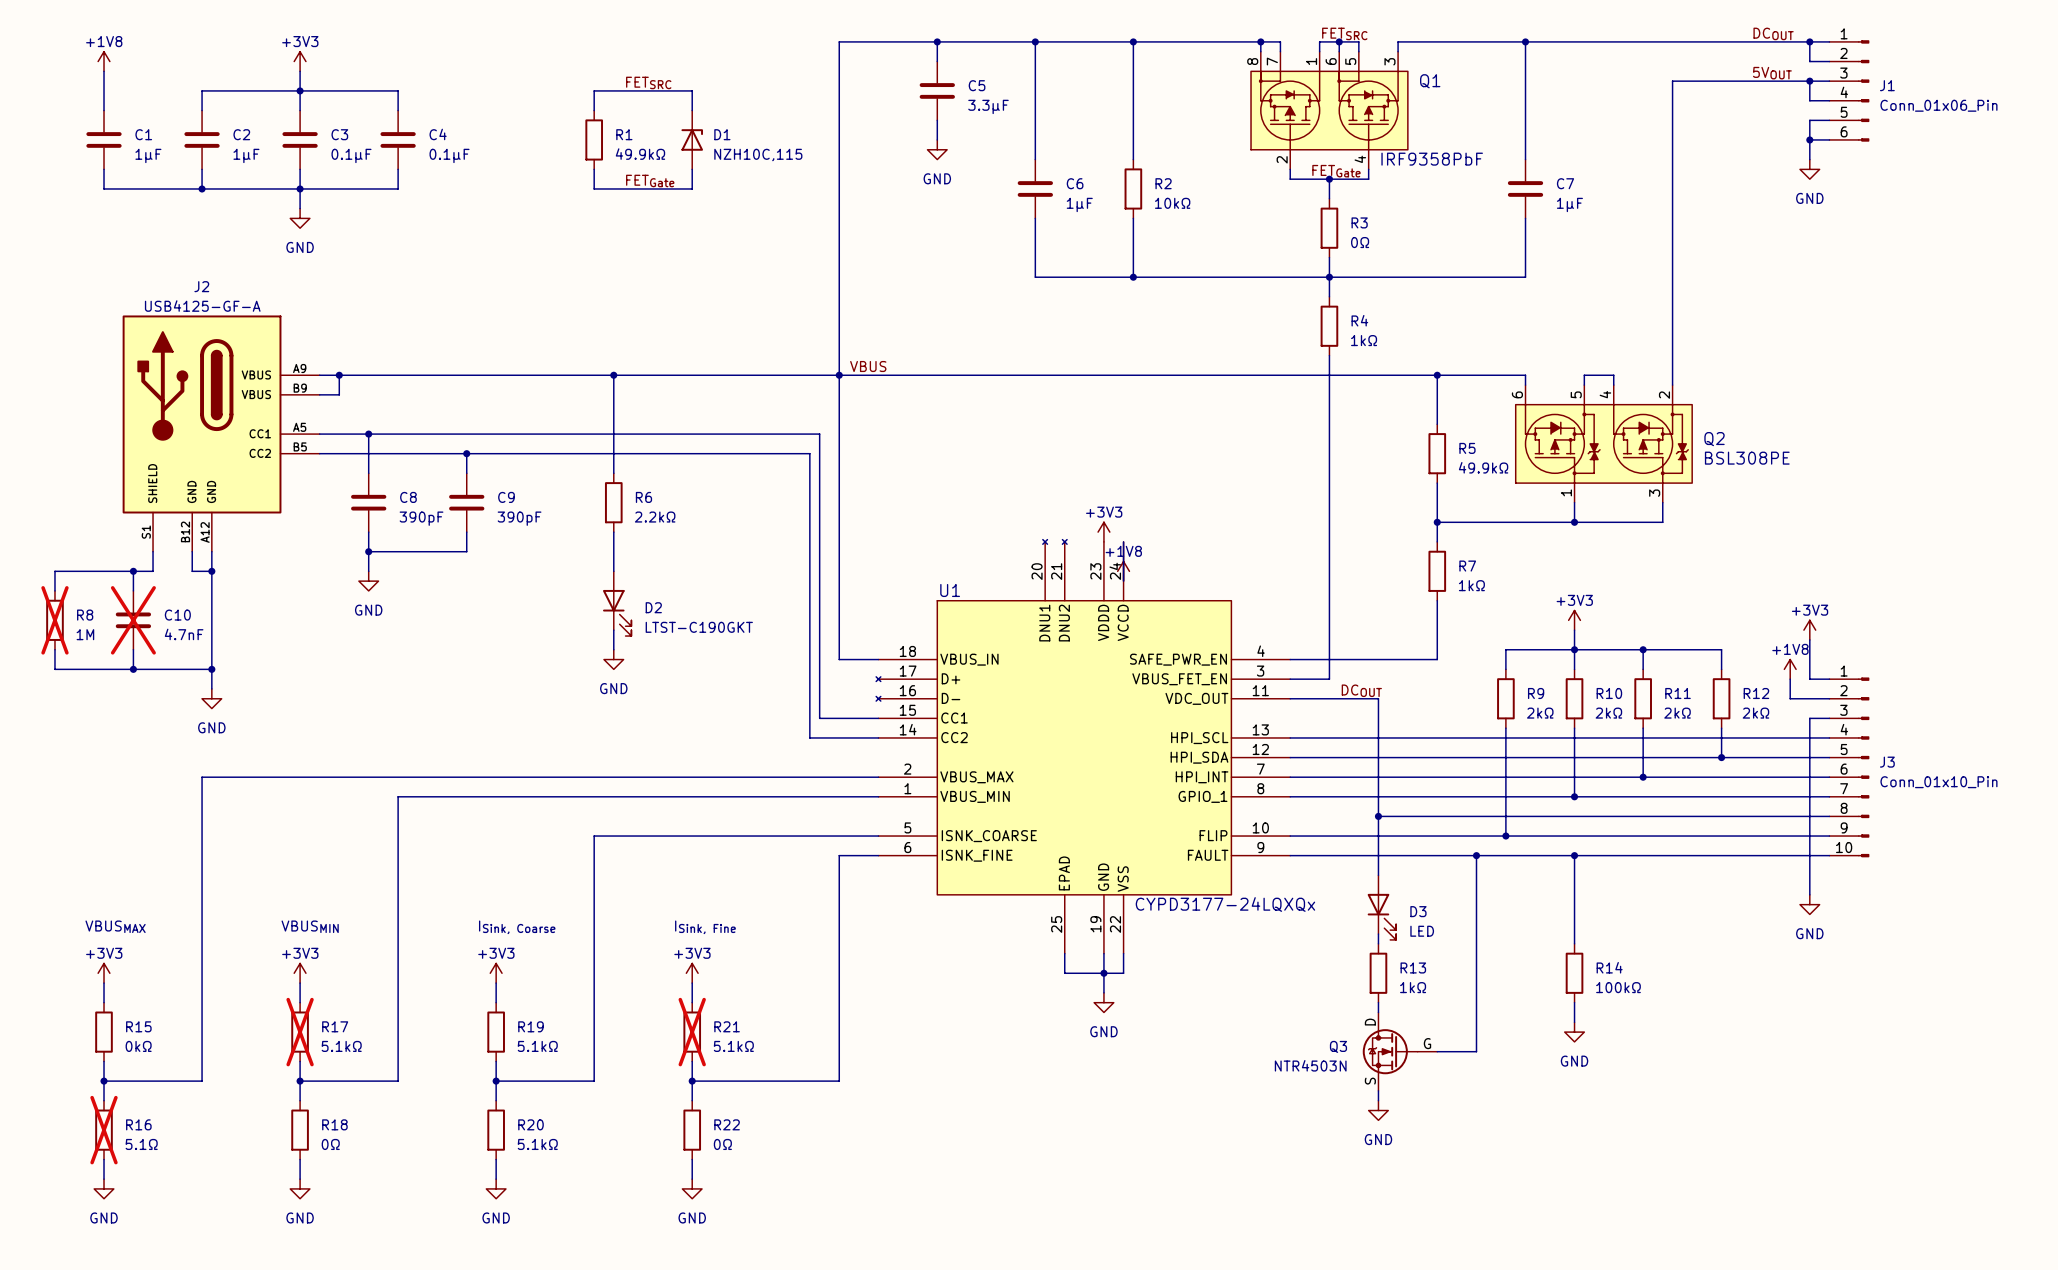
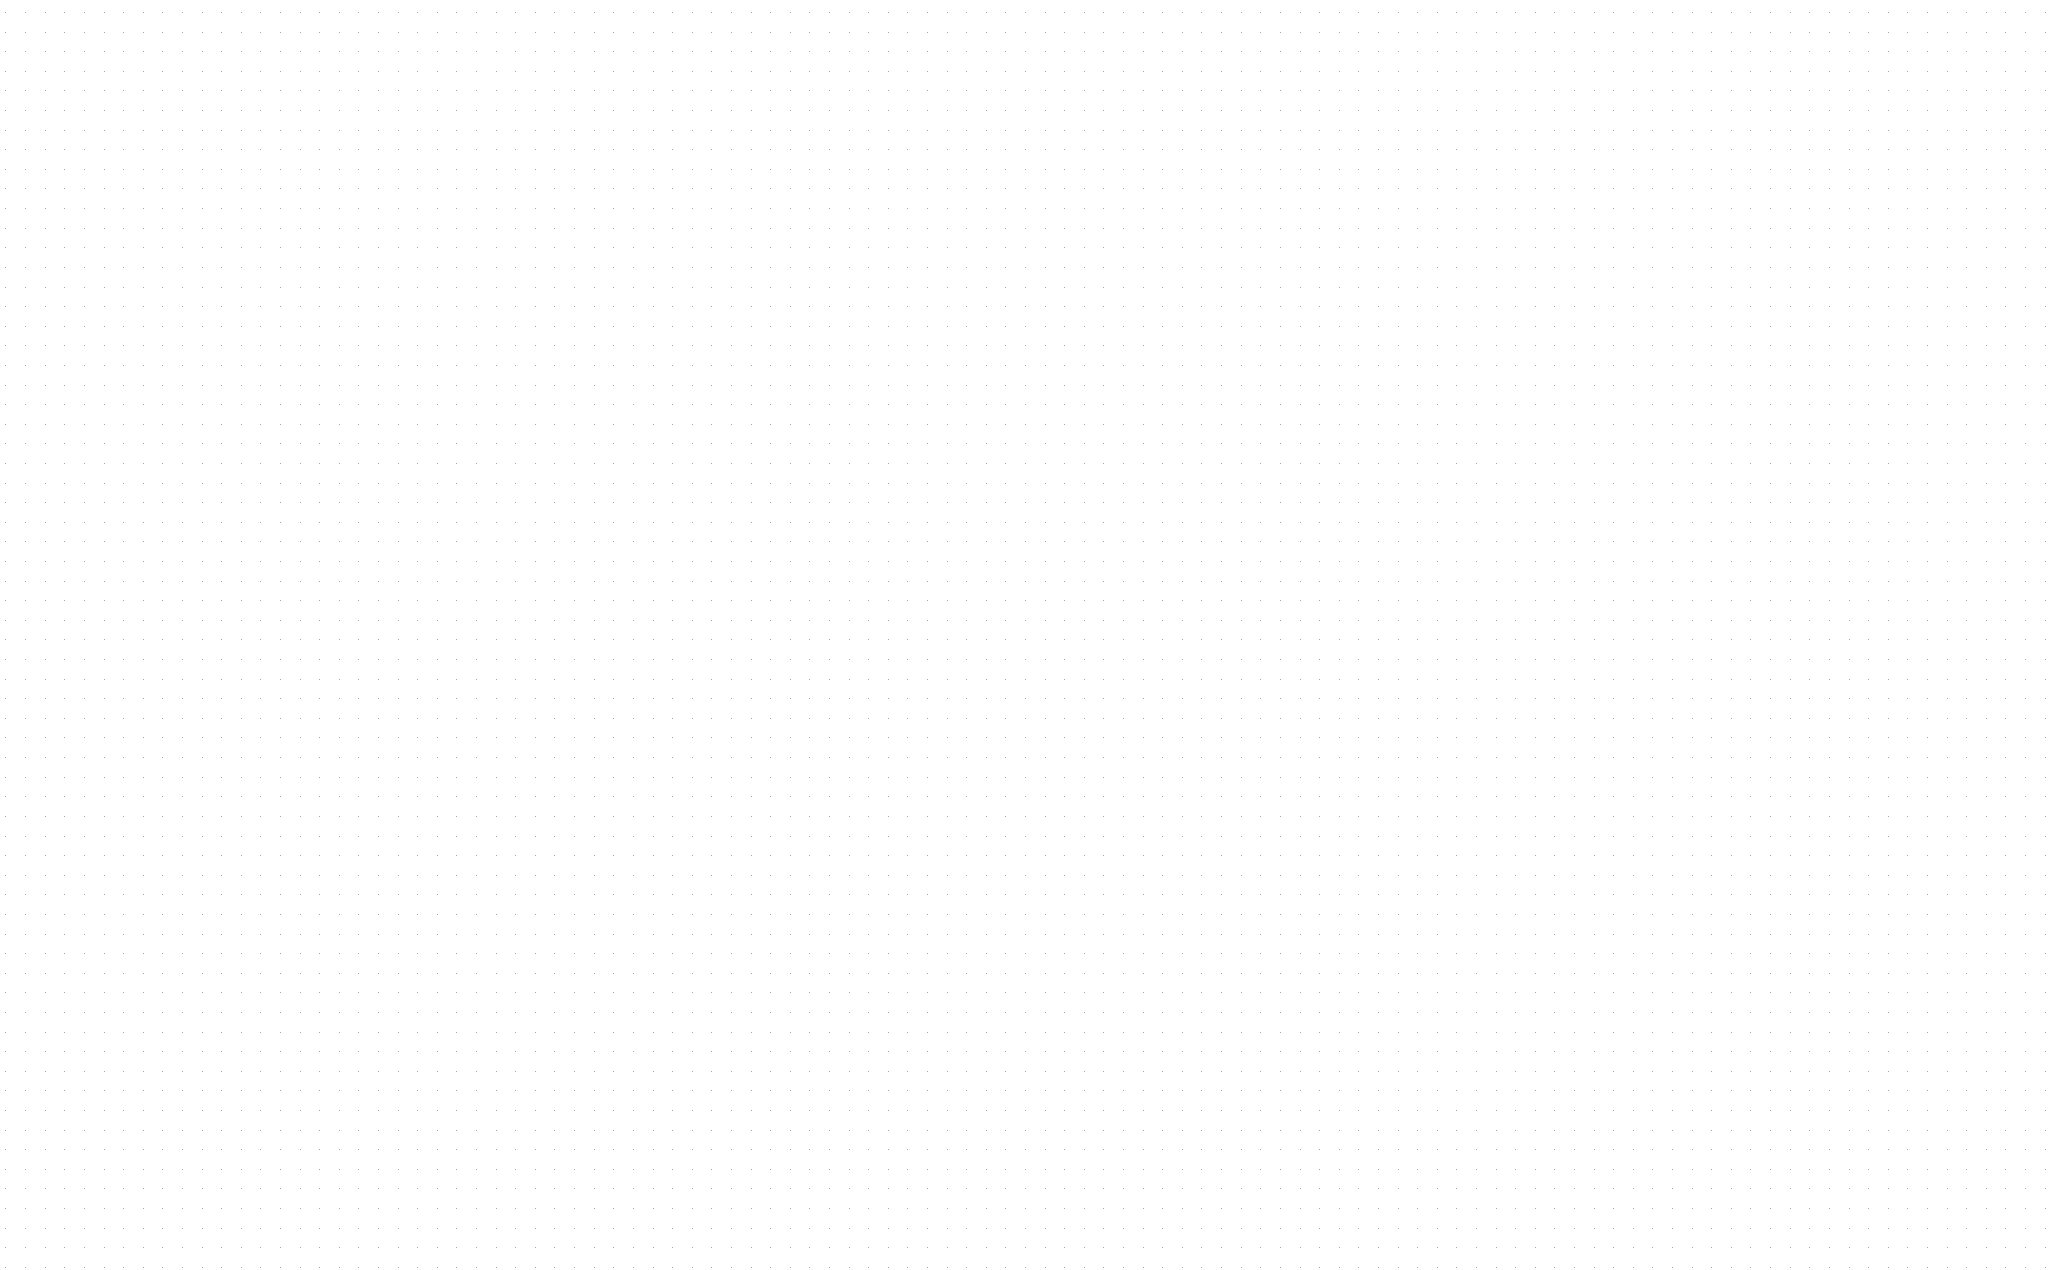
label: FETSRC (1344, 33) -> none
label: DCOUT (1773, 33) -> none
wire: (937, 41) (937, 61) -> none
junction: (937, 41) -> none
wire: (1035, 41) (1035, 159) -> none
junction: (1035, 41) -> none
wire: (1133, 41) (1133, 159) -> none
junction: (1133, 41) -> none
wire: (1260, 41) (1260, 51) -> none
junction: (1260, 41) -> none
wire: (1339, 41) (1339, 51) -> none
junction: (1339, 41) -> none
wire: (1525, 41) (1525, 159) -> none
junction: (1525, 41) -> none
wire: (1809, 41) (1809, 61) (1829, 61) -> none
junction: (1809, 41) -> none
wire: (1829, 41) (1398, 41) (1398, 51) -> none
wire: (1280, 51) (1280, 41) (839, 41) (839, 659) (878, 659) -> none
wire: (1319, 51) (1319, 41) (1358, 41) (1358, 51) -> none
power symbol: +1V8 (104, 61) -> none
power symbol: +3V3 (300, 61) -> none
wire: (104, 71) (104, 110) -> none
wire: (300, 71) (300, 110) -> none
label: 5VOUT (1772, 73) -> none
wire: (1809, 81) (1809, 100) (1829, 100) -> none
junction: (1809, 81) -> none
wire: (1829, 81) (1672, 81) (1672, 385) -> none
label: FETSRC (648, 82) -> none
junction: (300, 90) -> none
C5: 3.3µF (937, 90) -> none
J1: Conn_01x06_Pin (1849, 90) -> none
wire: (202, 110) (202, 90) (398, 90) (398, 110) -> none
wire: (594, 110) (594, 90) (692, 90) (692, 110) -> none
Q1: IRF9358PbF (1329, 110) -> none
wire: (937, 120) (937, 139) -> none
wire: (1829, 120) (1809, 120) (1809, 159) -> none
C1: 1µF (104, 139) -> none
C2: 1µF (202, 139) -> none
C3: 0.1µF (300, 139) -> none
C4: 0.1µF (398, 139) -> none
R1: 49.9kΩ (594, 139) -> none
D1: NZH10C,115 (692, 139) -> none
wire: (1809, 139) (1829, 139) -> none
junction: (1809, 139) -> none
power symbol: GND (937, 149) -> none
wire: (104, 169) (104, 188) (398, 188) (398, 169) -> none
wire: (202, 169) (202, 188) -> none
wire: (300, 169) (300, 208) -> none
wire: (594, 169) (594, 188) (692, 188) (692, 169) -> none
wire: (1290, 169) (1290, 179) (1368, 179) (1368, 169) -> none
power symbol: GND (1809, 169) -> none
label: FETGate (1336, 171) -> none
wire: (1329, 179) (1329, 198) -> none
junction: (1329, 179) -> none
label: FETGate (650, 180) -> none
junction: (202, 188) -> none
junction: (300, 188) -> none
C6: 1µF (1035, 188) -> none
R2: 10kΩ (1133, 188) -> none
C7: 1µF (1525, 188) -> none
power symbol: GND (300, 218) -> none
wire: (1035, 218) (1035, 277) (1525, 277) (1525, 218) -> none
wire: (1133, 218) (1133, 277) -> none
R3: 0Ω (1329, 228) -> none
wire: (1329, 257) (1329, 296) -> none
junction: (1133, 277) -> none
junction: (1329, 277) -> none
R4: 1kΩ (1329, 326) -> none
wire: (1329, 355) (1329, 679) (1290, 679) -> none
label: VBUS (868, 366) -> none
wire: (319, 375) (1525, 375) (1525, 385) -> none
wire: (339, 375) (339, 394) (319, 394) -> none
junction: (339, 375) -> none
wire: (613, 375) (613, 473) -> none
junction: (613, 375) -> none
junction: (839, 375) -> none
wire: (1437, 375) (1437, 424) -> none
junction: (1437, 375) -> none
wire: (1584, 385) (1584, 375) (1613, 375) (1613, 385) -> none
J2: USB4125-GF-A (221, 433) -> none
wire: (319, 434) (819, 434) (819, 718) (878, 718) -> none
wire: (368, 434) (368, 473) -> none
junction: (368, 434) -> none
Q2: BSL308PE (1603, 443) -> none
wire: (319, 453) (809, 453) (809, 737) (878, 737) -> none
wire: (466, 453) (466, 473) -> none
junction: (466, 453) -> none
R5: 49.9kΩ (1437, 453) -> none
wire: (1437, 483) (1437, 541) -> none
C8: 390pF (368, 502) -> none
C9: 390pF (466, 502) -> none
R6: 2.2kΩ (613, 502) -> none
wire: (1574, 502) (1574, 522) -> none
wire: (1662, 502) (1662, 522) (1437, 522) -> none
junction: (1437, 522) -> none
junction: (1574, 522) -> none
wire: (368, 532) (368, 571) -> none
wire: (466, 532) (466, 551) (368, 551) -> none
wire: (613, 532) (613, 571) -> none
power symbol: +3V3 (1103, 532) -> none
wire: (1123, 541) (1123, 581) -> none
wire: (153, 551) (153, 571) (54, 571) (54, 590) -> none
wire: (192, 551) (192, 571) (211, 571) -> none
wire: (211, 551) (211, 688) -> none
junction: (368, 551) -> none
wire: (133, 571) (133, 590) -> none
junction: (133, 571) -> none
junction: (211, 571) -> none
power symbol: +1V8 (1123, 571) -> none
R7: 1kΩ (1437, 571) -> none
power symbol: GND (368, 581) -> none
wire: (1437, 600) (1437, 659) (1290, 659) -> none
D2: LTST-C190GKT (617, 603) -> none
R8: 1M (54, 620) -> none
C10: 4.7nF (133, 620) -> none
power symbol: +3V3 (1574, 620) -> none
wire: (613, 630) (613, 649) -> none
wire: (1574, 630) (1574, 669) -> none
power symbol: +3V3 (1809, 630) -> none
wire: (1809, 639) (1809, 679) (1829, 679) -> none
wire: (54, 649) (54, 669) (211, 669) -> none
wire: (133, 649) (133, 669) -> none
junction: (1574, 649) -> none
wire: (1643, 649) (1643, 669) -> none
junction: (1643, 649) -> none
power symbol: GND (613, 659) -> none
junction: (133, 669) -> none
junction: (211, 669) -> none
wire: (1505, 669) (1505, 649) (1721, 649) (1721, 669) -> none
power symbol: +1V8 (1790, 669) -> none
wire: (1790, 679) (1790, 698) (1829, 698) -> none
label: DCOUT (1361, 690) -> none
power symbol: GND (211, 698) -> none
wire: (1290, 698) (1378, 698) (1378, 875) -> none
R9: 2kΩ (1505, 698) -> none
R10: 2kΩ (1574, 698) -> none
R11: 2kΩ (1643, 698) -> none
R12: 2kΩ (1721, 698) -> none
wire: (1829, 718) (1809, 718) (1809, 894) -> none
wire: (1505, 728) (1505, 836) -> none
wire: (1574, 728) (1574, 796) -> none
wire: (1643, 728) (1643, 777) -> none
wire: (1721, 728) (1721, 757) -> none
wire: (1290, 737) (1829, 737) -> none
U1: CYPD3177-24LQXQx (1083, 746) -> none
wire: (1290, 757) (1829, 757) -> none
junction: (1721, 757) -> none
J3: Conn_01x10_Pin (1849, 767) -> none
wire: (878, 777) (202, 777) (202, 1081) (104, 1081) -> none
wire: (1290, 777) (1829, 777) -> none
junction: (1643, 777) -> none
wire: (878, 796) (398, 796) (398, 1081) (300, 1081) -> none
wire: (1290, 796) (1829, 796) -> none
junction: (1574, 796) -> none
wire: (1378, 816) (1829, 816) -> none
junction: (1378, 816) -> none
wire: (878, 836) (594, 836) (594, 1081) (496, 1081) -> none
wire: (1290, 836) (1829, 836) -> none
junction: (1505, 836) -> none
wire: (878, 855) (839, 855) (839, 1081) (692, 1081) -> none
wire: (1290, 855) (1829, 855) -> none
wire: (1476, 855) (1476, 1051) (1437, 1051) -> none
junction: (1476, 855) -> none
wire: (1574, 855) (1574, 943) -> none
junction: (1574, 855) -> none
power symbol: GND (1809, 904) -> none
D3: LED (1381, 907) -> none
text: VBUSMAX (115, 926) -> none
text: VBUSMIN (310, 926) -> none
text: ISink, Coarse (517, 927) -> none
text: ISink, Fine (705, 927) -> none
wire: (1378, 934) (1378, 943) -> none
wire: (1064, 953) (1064, 973) (1123, 973) (1123, 953) -> none
wire: (1103, 953) (1103, 992) -> none
power symbol: +3V3 (104, 973) -> none
power symbol: +3V3 (300, 973) -> none
power symbol: +3V3 (496, 973) -> none
power symbol: +3V3 (692, 973) -> none
junction: (1103, 973) -> none
R13: 1kΩ (1378, 973) -> none
R14: 100kΩ (1574, 973) -> none
wire: (104, 983) (104, 1002) -> none
wire: (300, 983) (300, 1002) -> none
wire: (496, 983) (496, 1002) -> none
wire: (692, 983) (692, 1002) -> none
power symbol: GND (1103, 1002) -> none
wire: (1378, 1002) (1378, 1012) -> none
wire: (1574, 1002) (1574, 1022) -> none
R15: 0kΩ (104, 1032) -> none
R17: 5.1kΩ (300, 1032) -> none
R19: 5.1kΩ (496, 1032) -> none
R21: 5.1kΩ (692, 1032) -> none
power symbol: GND (1574, 1032) -> none
Q3: NTR4503N (1400, 1051) -> none
wire: (104, 1061) (104, 1100) -> none
wire: (300, 1061) (300, 1100) -> none
wire: (496, 1061) (496, 1100) -> none
wire: (692, 1061) (692, 1100) -> none
junction: (104, 1081) -> none
junction: (300, 1081) -> none
junction: (496, 1081) -> none
junction: (692, 1081) -> none
wire: (1378, 1090) (1378, 1100) -> none
power symbol: GND (1378, 1110) -> none
R16: 5.1Ω (104, 1130) -> none
R18: 0Ω (300, 1130) -> none
R20: 5.1kΩ (496, 1130) -> none
R22: 0Ω (692, 1130) -> none
wire: (104, 1159) (104, 1179) -> none
wire: (300, 1159) (300, 1179) -> none
wire: (496, 1159) (496, 1179) -> none
wire: (692, 1159) (692, 1179) -> none
power symbol: GND (104, 1188) -> none
power symbol: GND (300, 1188) -> none
power symbol: GND (496, 1188) -> none
power symbol: GND (692, 1188) -> none

